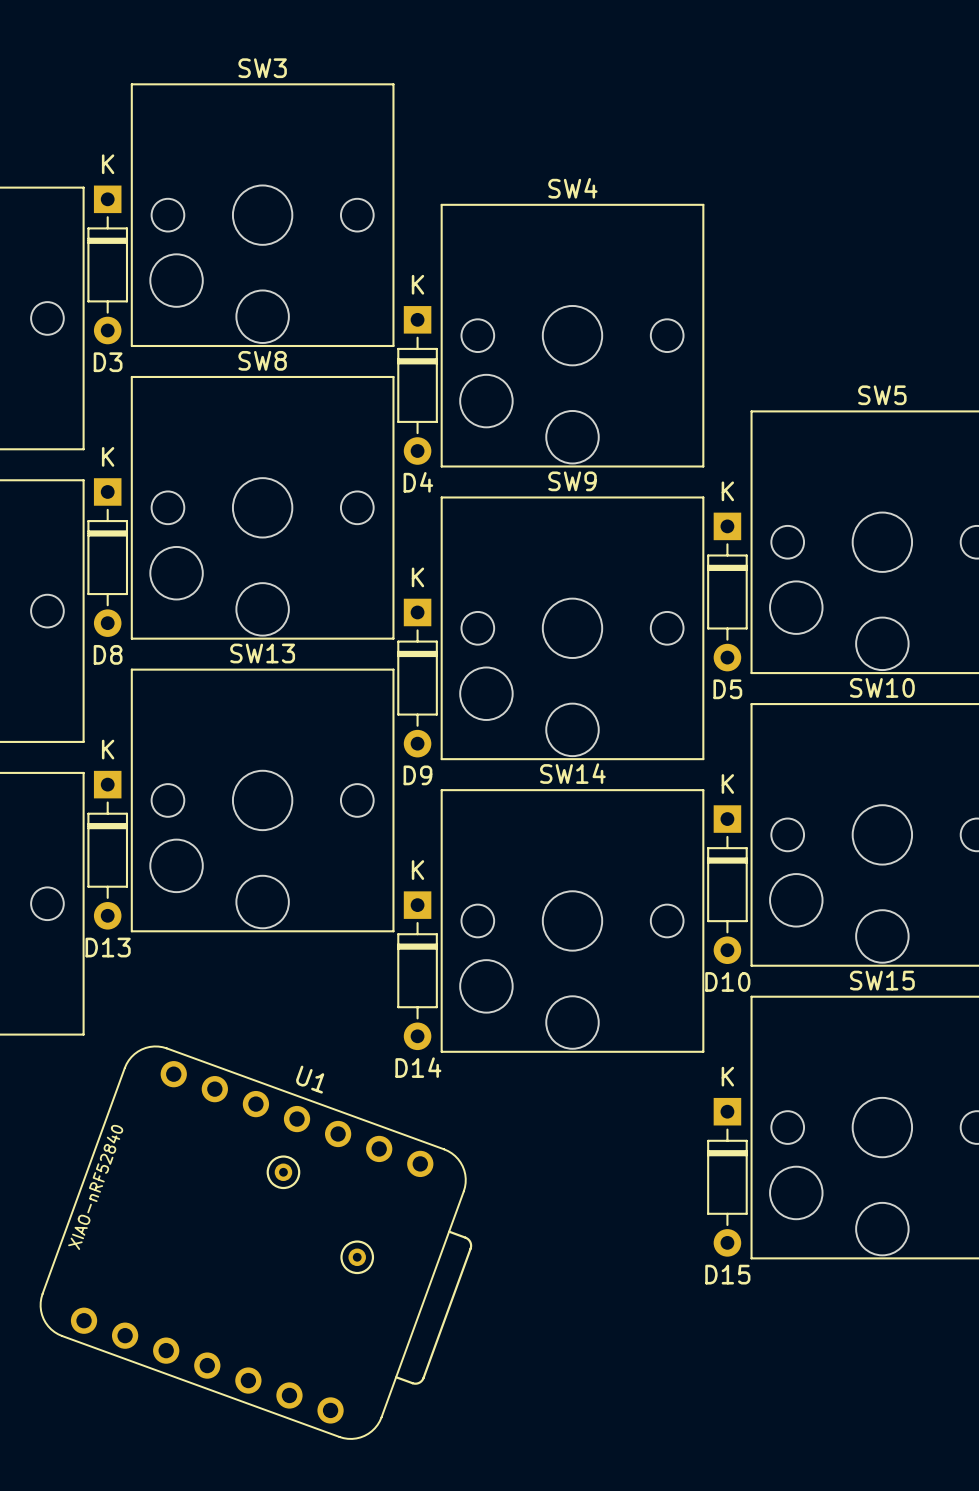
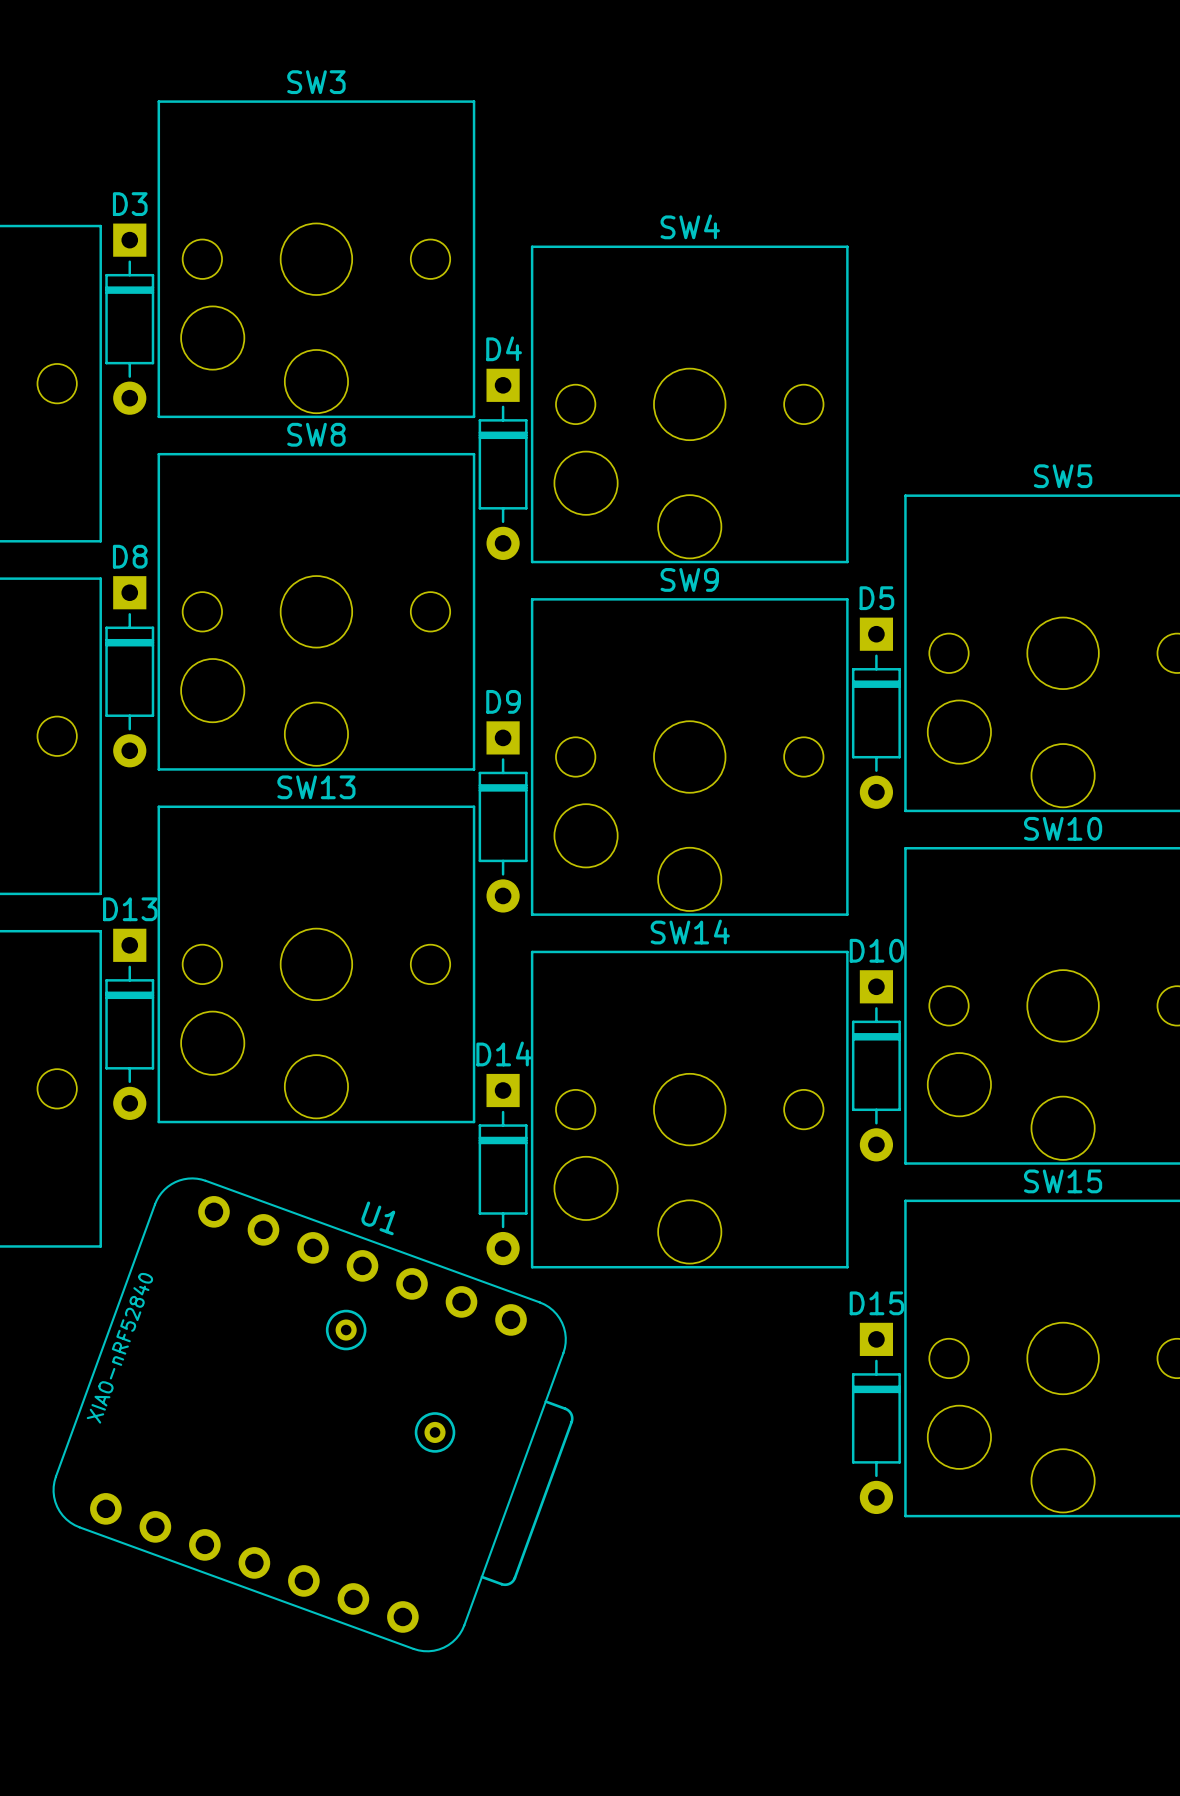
D3 text: K (108, 164) -> none
D4 text: K (417, 284) -> none
D3 name position: D3 (108, 362) -> D3 (130, 204)
D8 text: K (108, 456) -> none
D4 name position: D4 (418, 482) -> D4 (504, 348)
D5 text: K (727, 491) -> none
D9 text: K (417, 577) -> none
D8 name position: D8 (108, 654) -> D8 (130, 556)
D5 name position: D5 (727, 689) -> D5 (876, 598)
D13 text: K (108, 749) -> none
D9 name position: D9 (417, 775) -> D9 (503, 701)
D10 text: K (727, 783) -> none
D14 text: K (417, 870) -> none
D13 name position: D13 (108, 947) -> D13 (130, 909)
D10 name position: D10 (727, 981) -> D10 (876, 950)
U1 footprint: [39, 1045, 473, 1440] -> [52, 1177, 574, 1653]
D14 name position: D14 (418, 1067) -> D14 (504, 1053)
D15 text: K (727, 1076) -> none
D15 name position: D15 (727, 1274) -> D15 (876, 1303)

